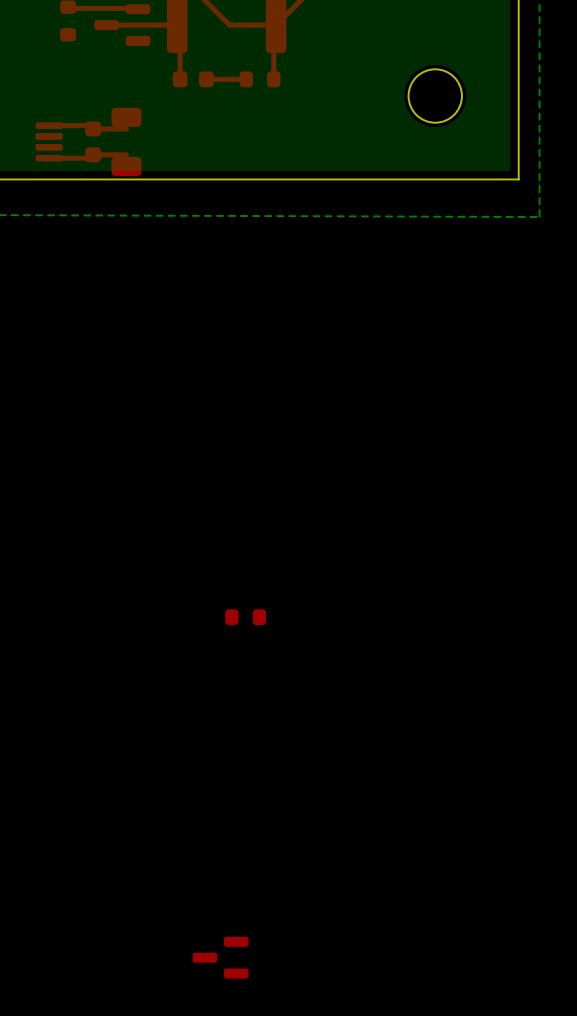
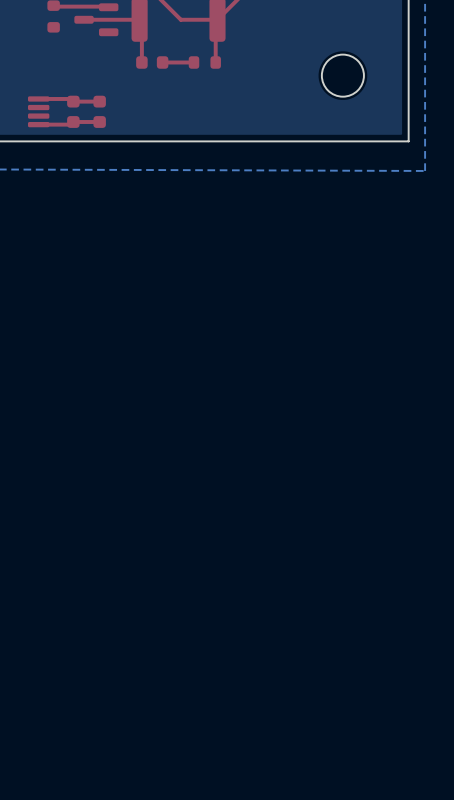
part footprint: [111, 107, 142, 177] -> [93, 95, 106, 128]
part: (245, 617) -> none
part: (220, 957) -> none

